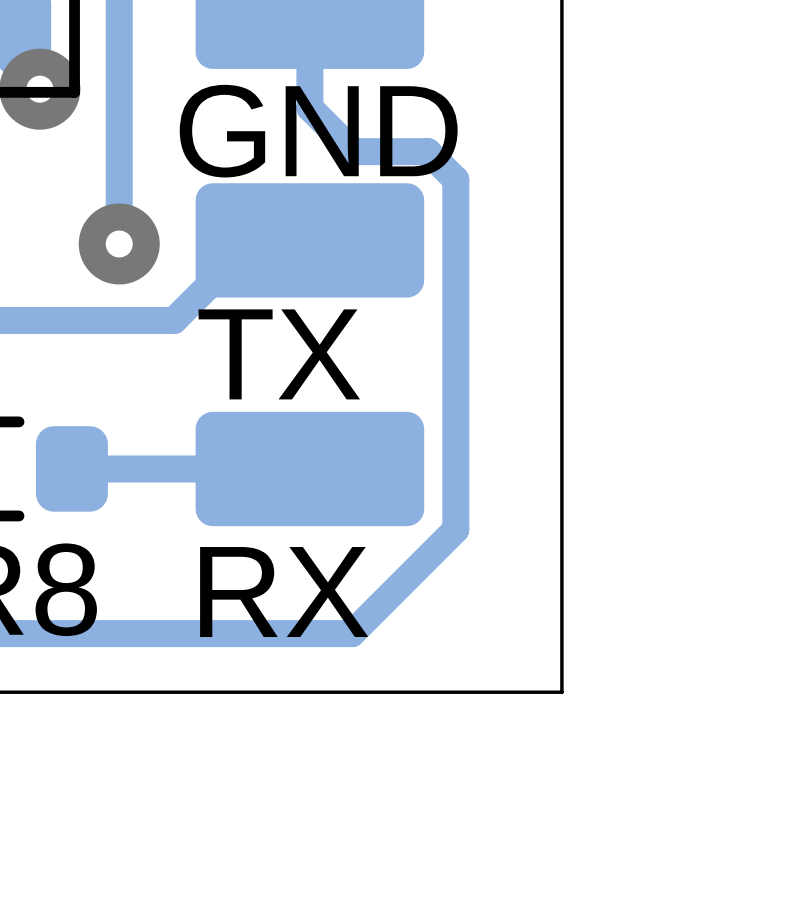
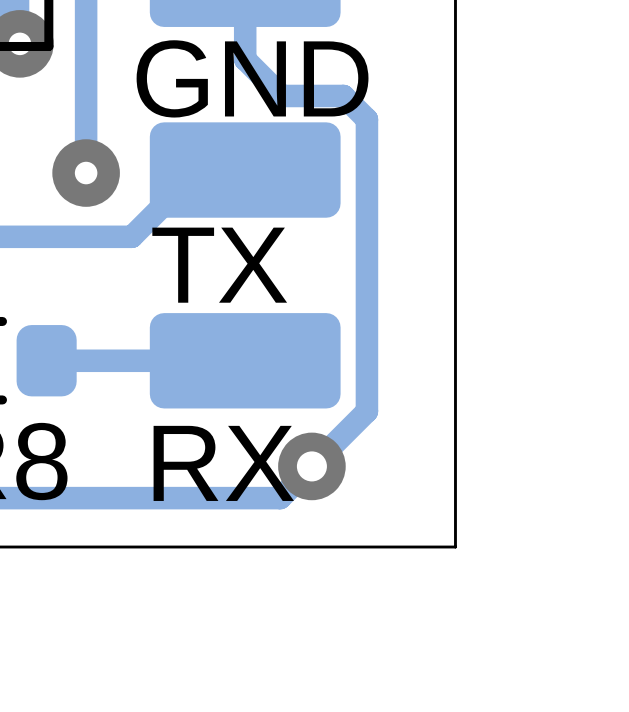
via: none -> (311, 466)

